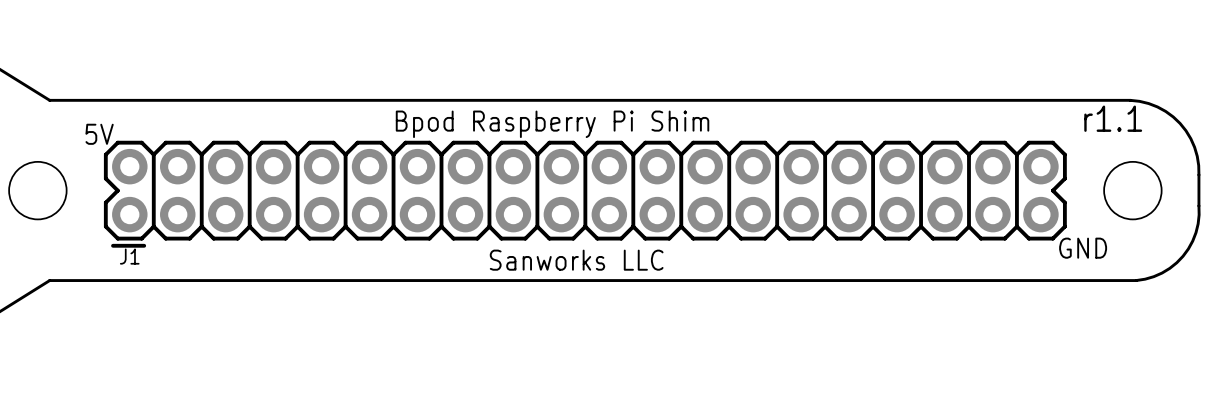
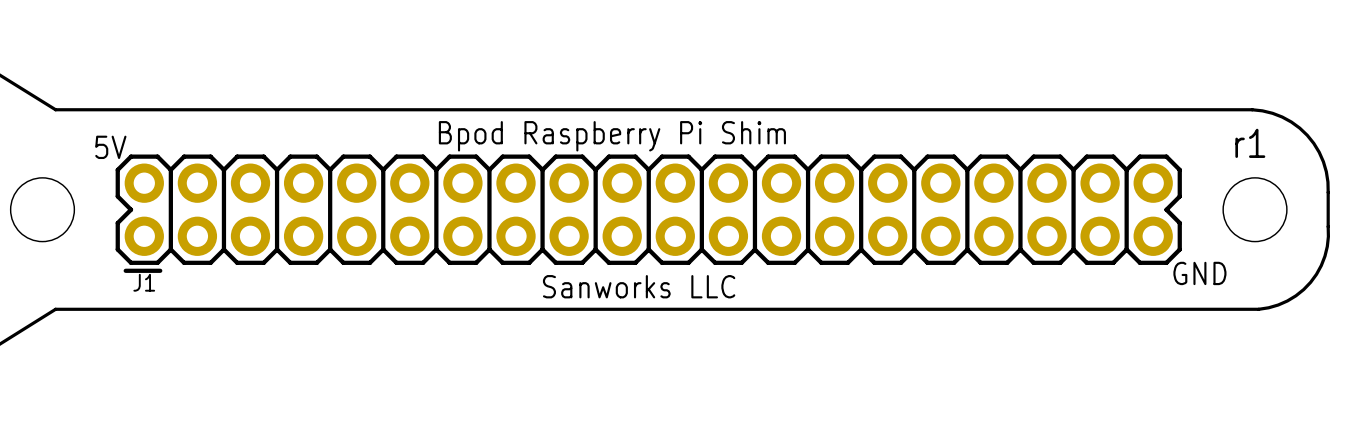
text: r1.1 (1113, 118) -> r1 (1250, 143)

